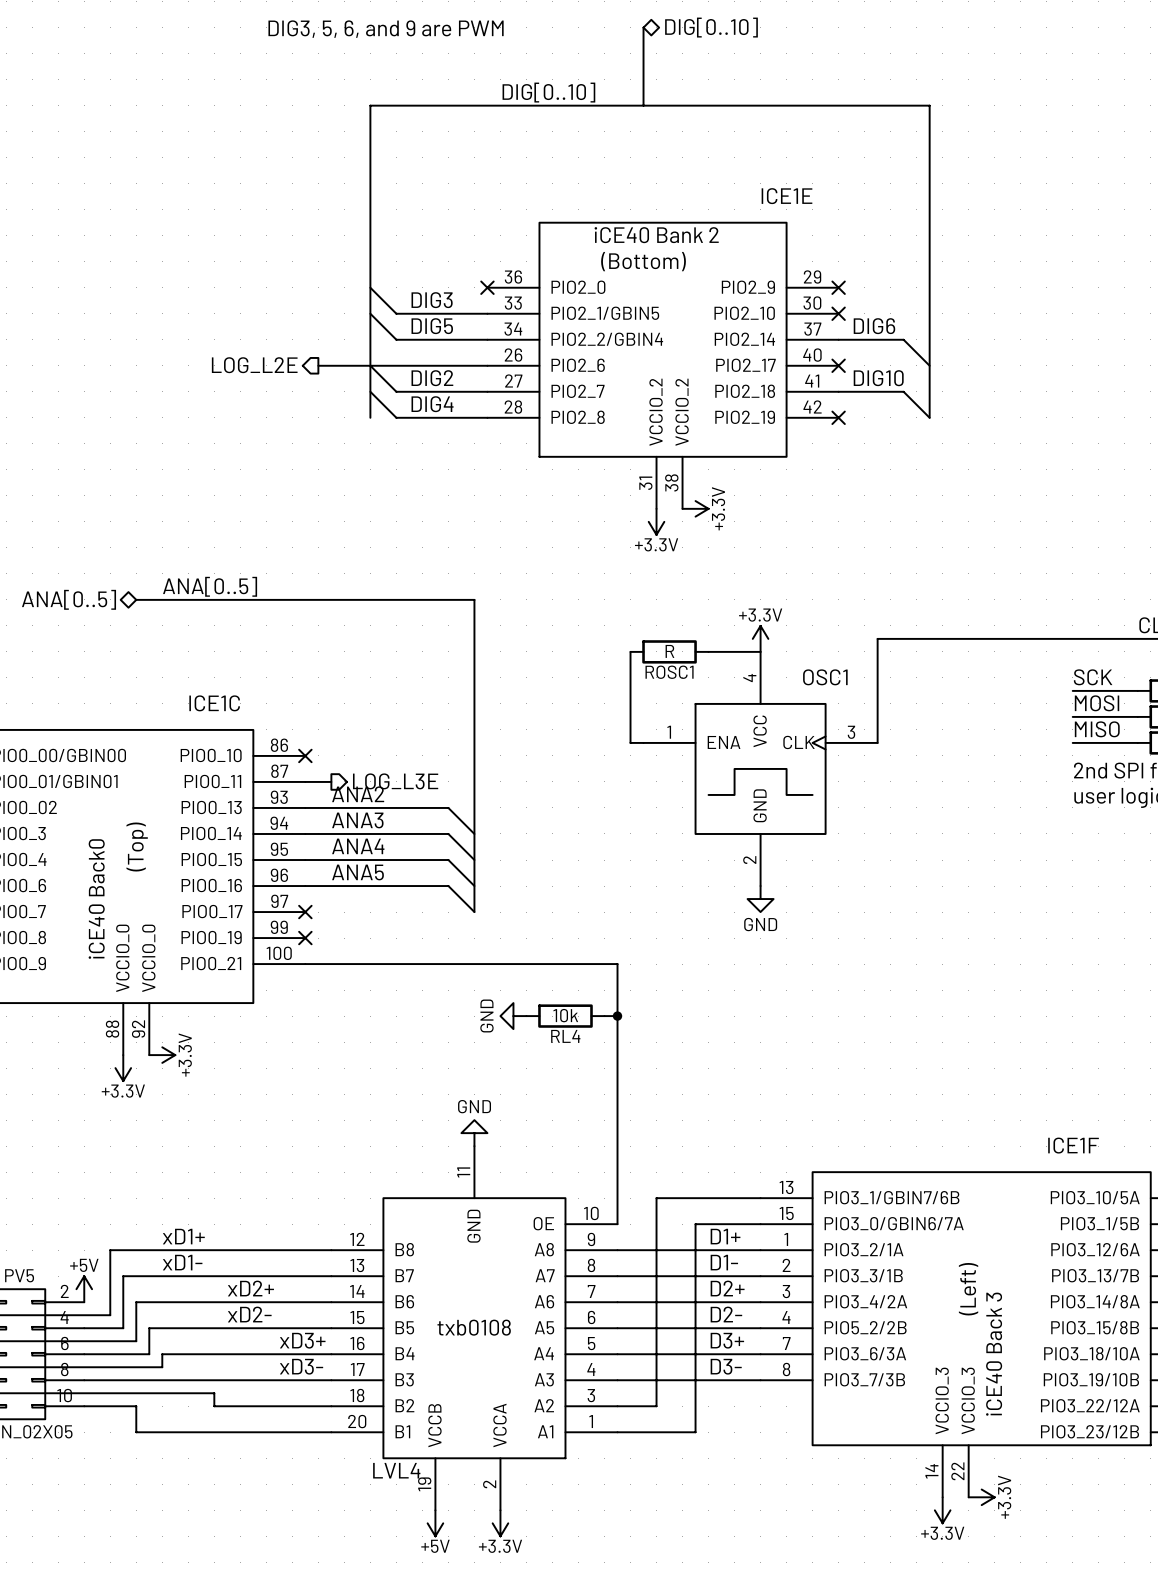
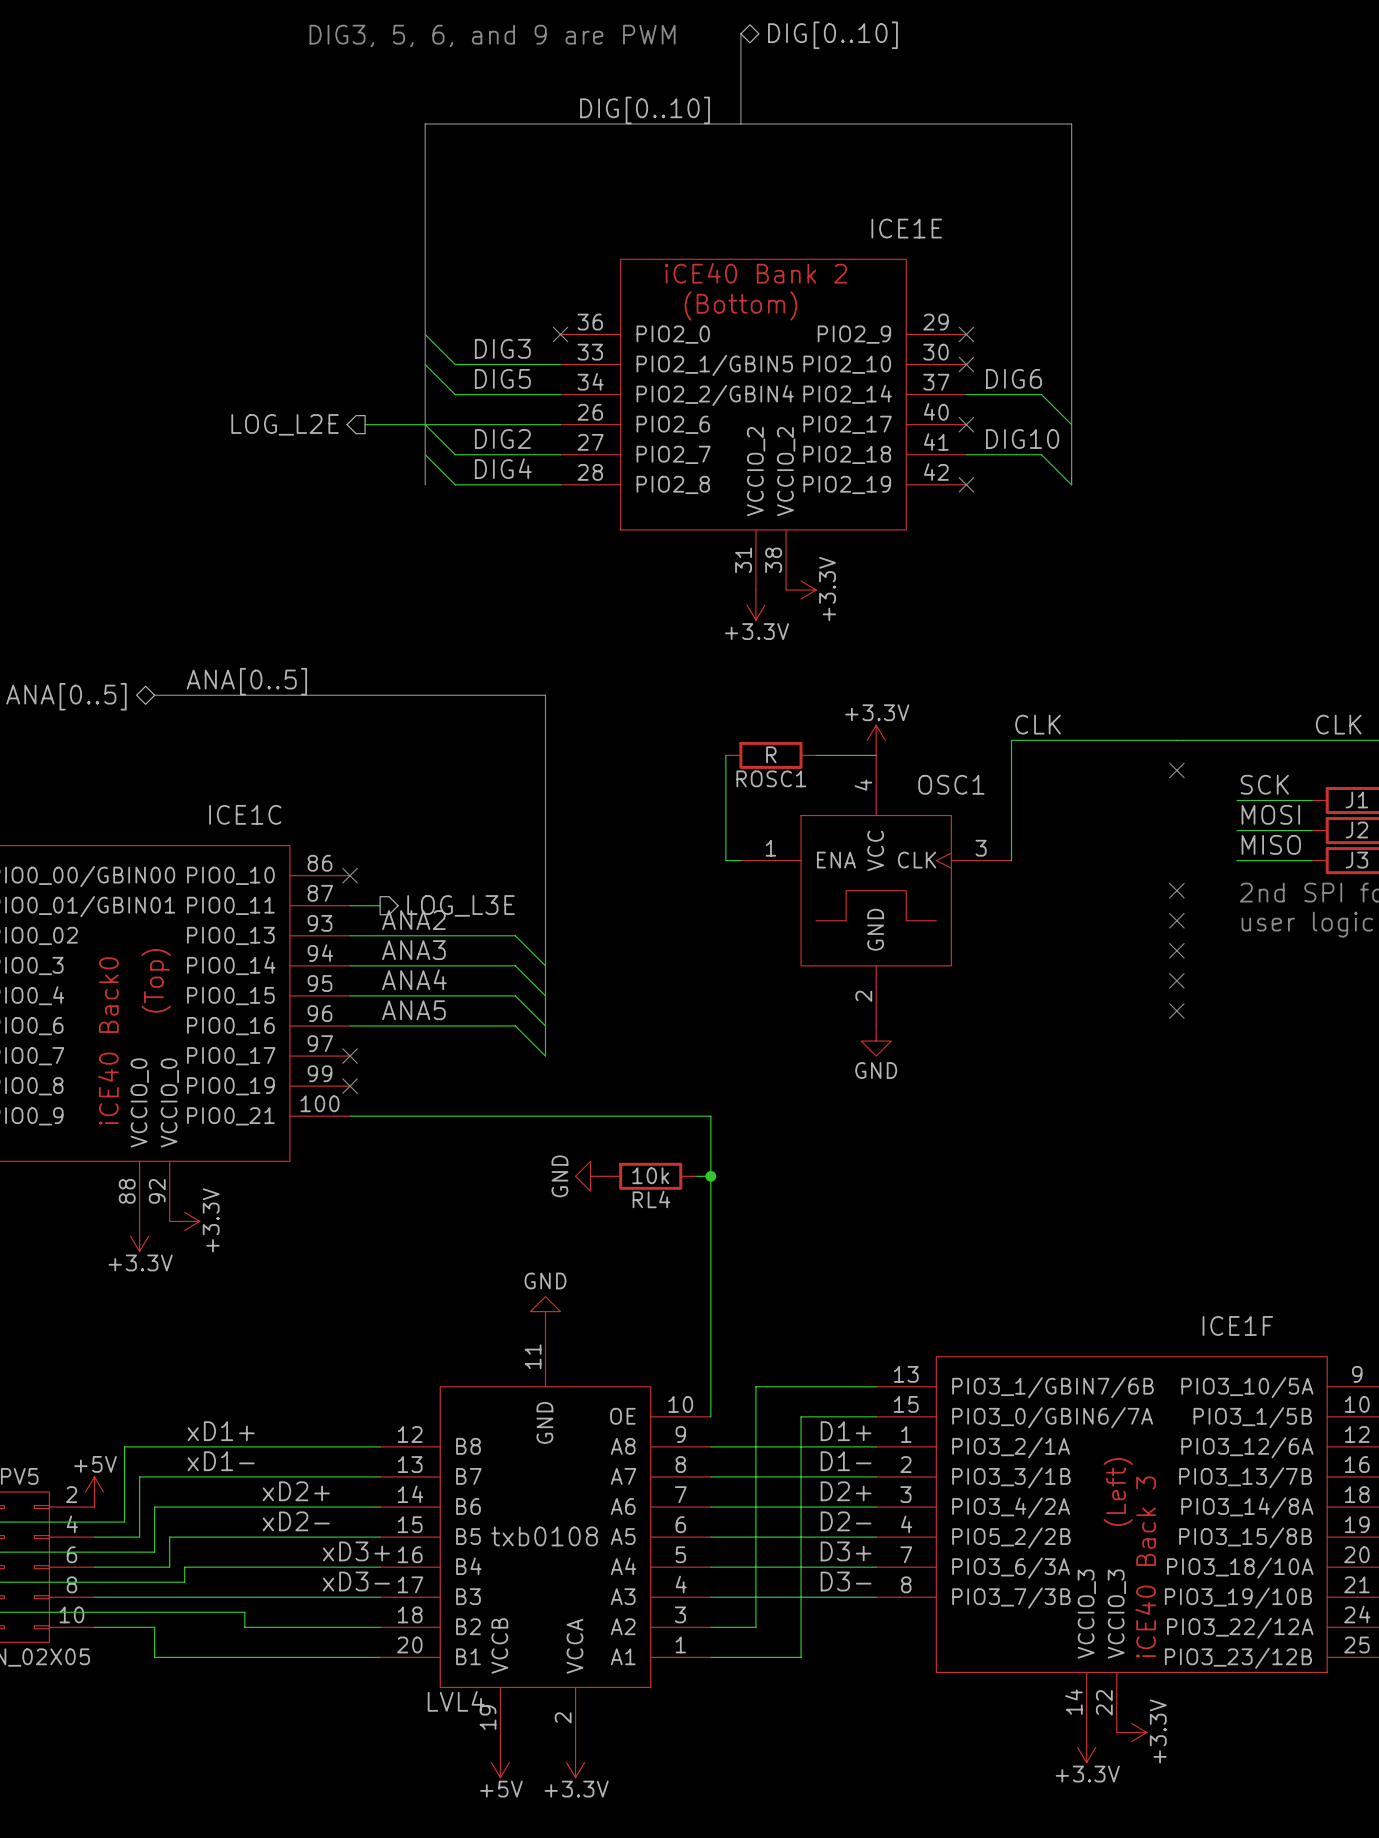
label: none -> CLK (1038, 724)
no-connect mark: none -> (1176, 770)
no-connect mark: none -> (1176, 890)
no-connect mark: none -> (1176, 920)
no-connect mark: none -> (1176, 950)
no-connect mark: none -> (1176, 980)
no-connect mark: none -> (1176, 1010)

